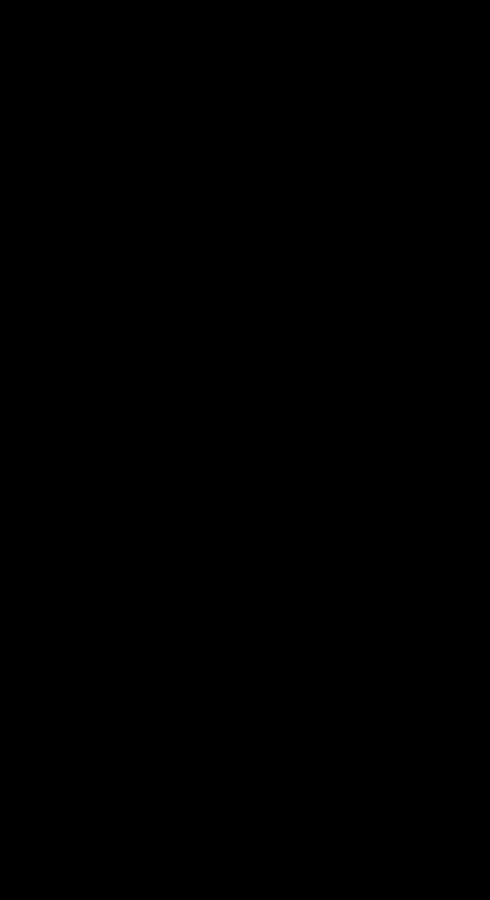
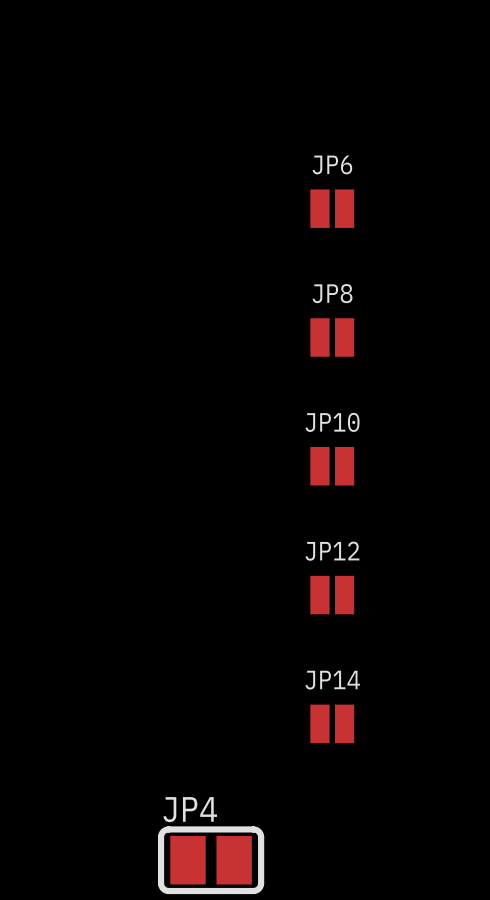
JP6: none -> (332, 208)
JP8: none -> (332, 337)
JP10: none -> (332, 466)
JP12: none -> (332, 595)
JP14: none -> (332, 723)
JP4: none -> (211, 860)

